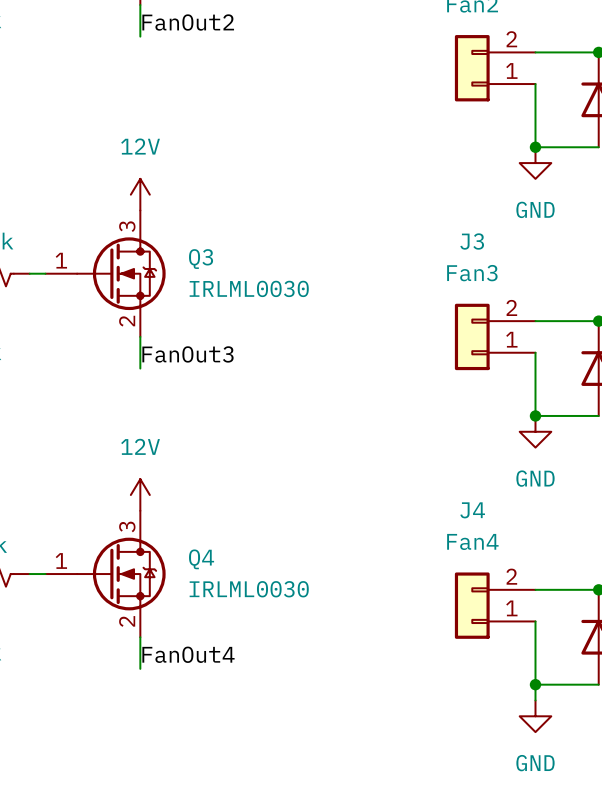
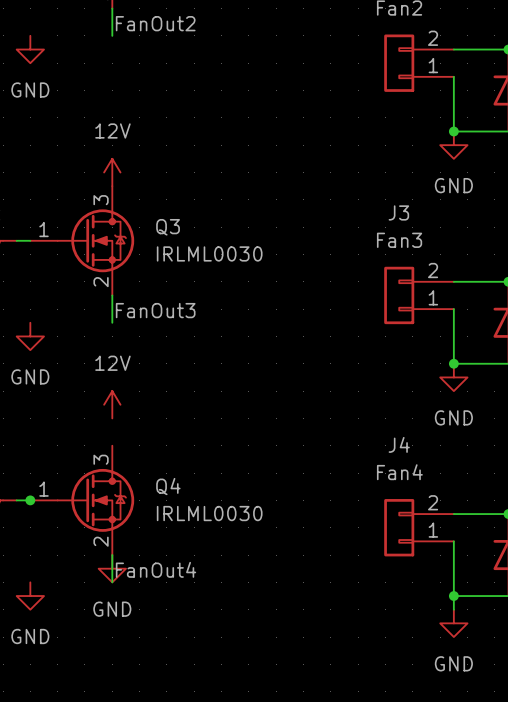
power symbol: none -> GND (30, 49)
power symbol: none -> GND (30, 336)
power symbol position: 12V (140, 495) -> 12V (112, 404)
junction: none -> (30, 500)
power symbol: none -> GND (112, 568)
power symbol: none -> GND (30, 596)

